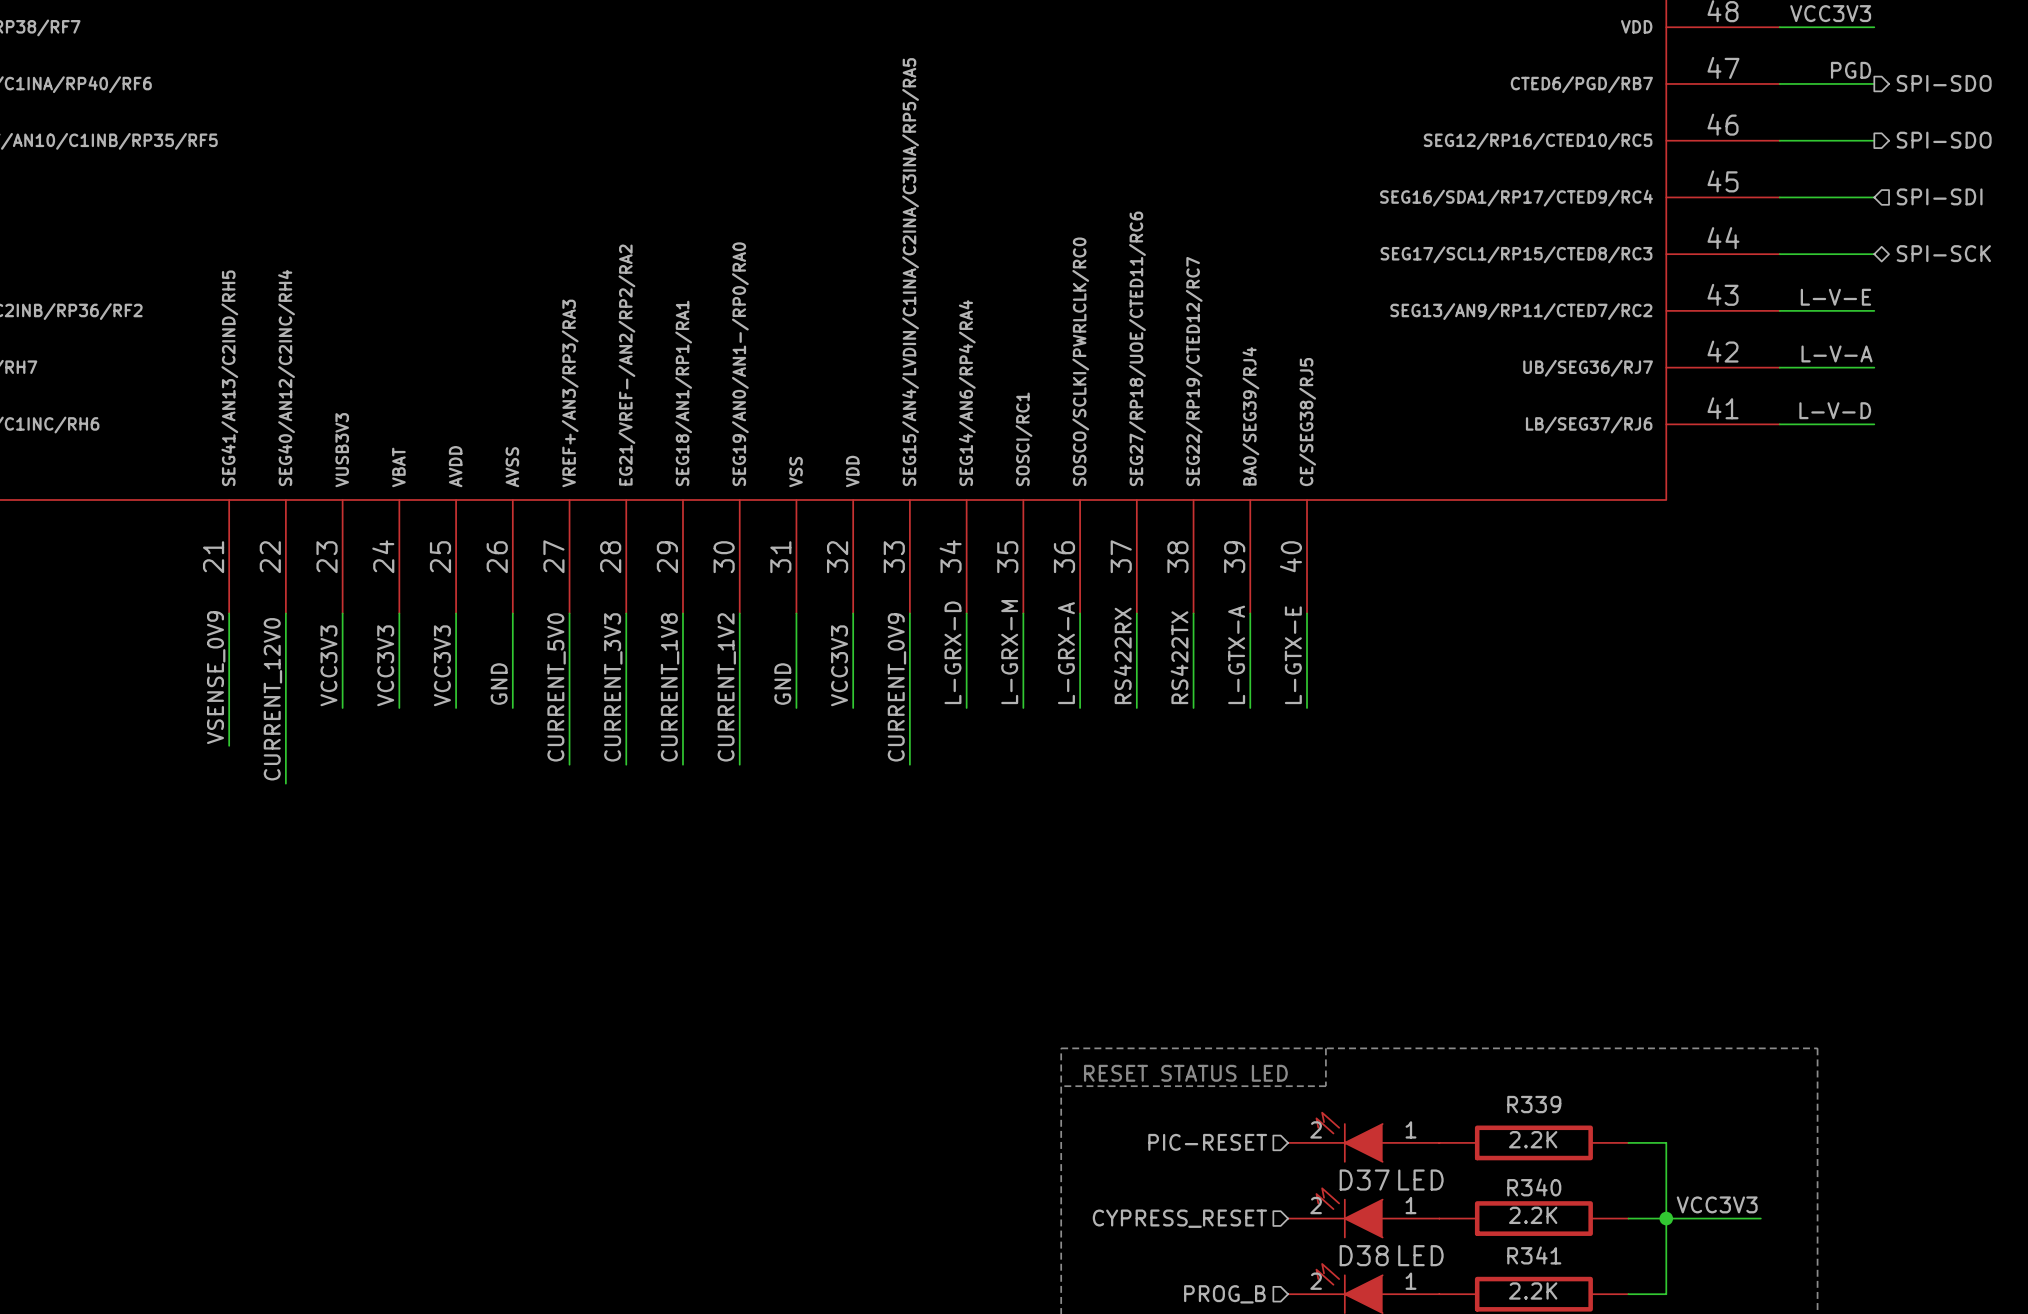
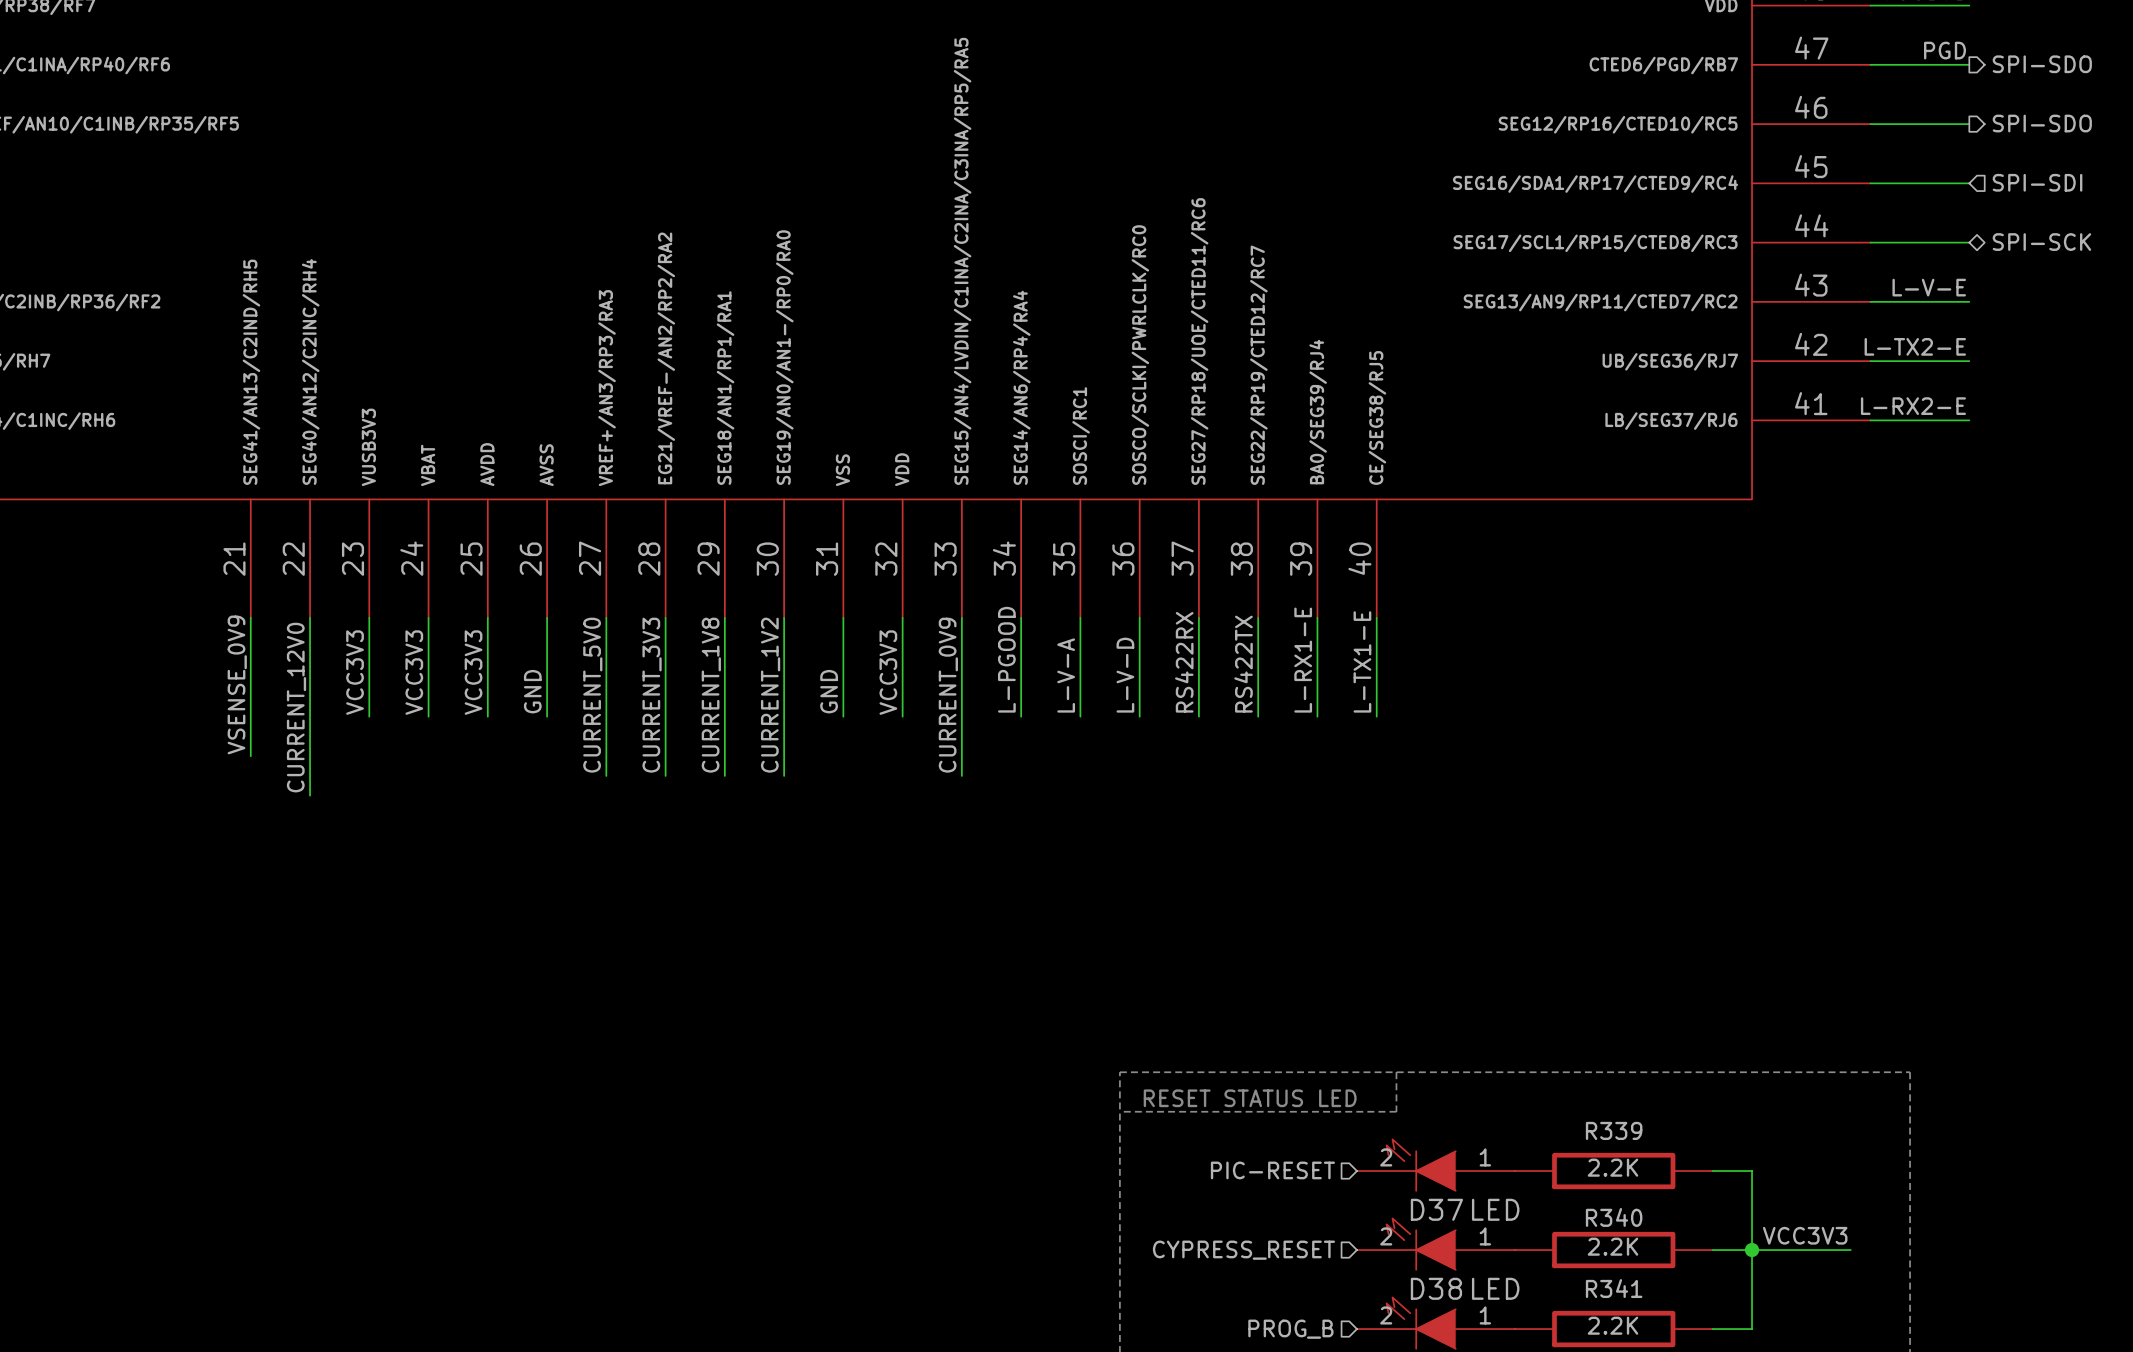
label: L-V-A (1836, 353) -> L-TX2-E (1915, 346)
label: L-V-D (1835, 410) -> L-RX2-E (1913, 406)
label: L-GRX-D (952, 652) -> L-PGOOD (1006, 659)
label: L-GRX-M (1009, 652) -> L-V-A (1066, 675)
label: L-GRX-A (1066, 653) -> L-V-D (1125, 675)
label: L-GTX-A (1236, 654) -> L-RX1-E (1303, 660)
label: L-GTX-E (1293, 655) -> L-TX1-E (1362, 661)

